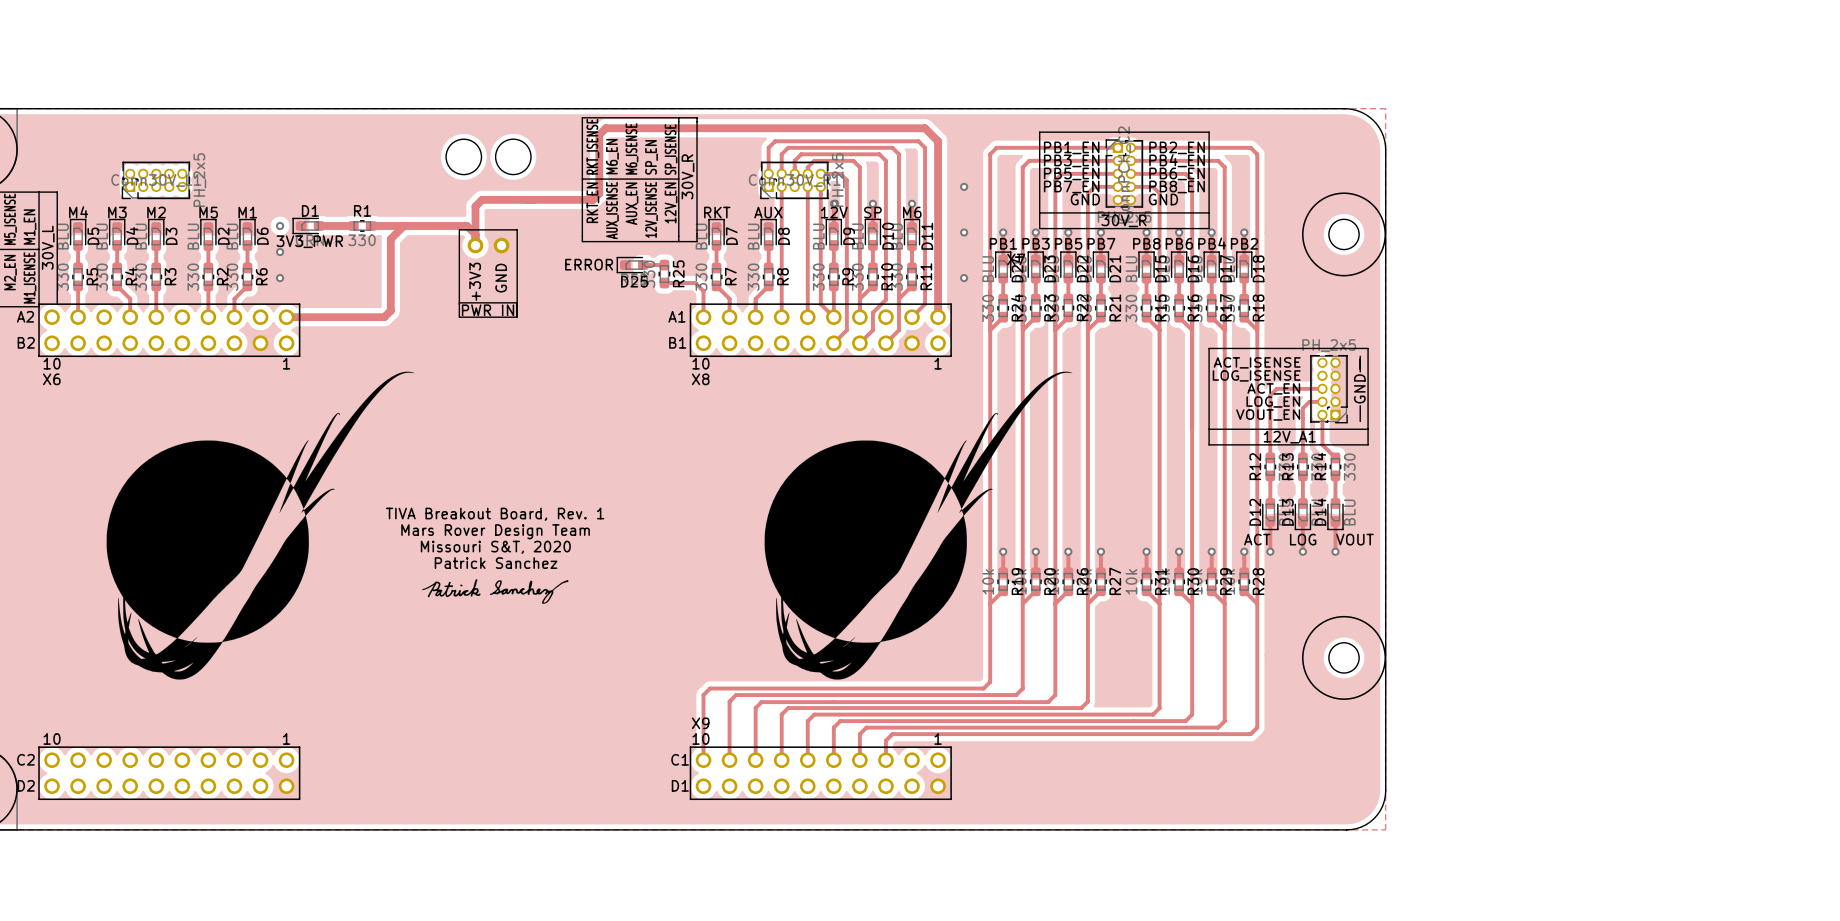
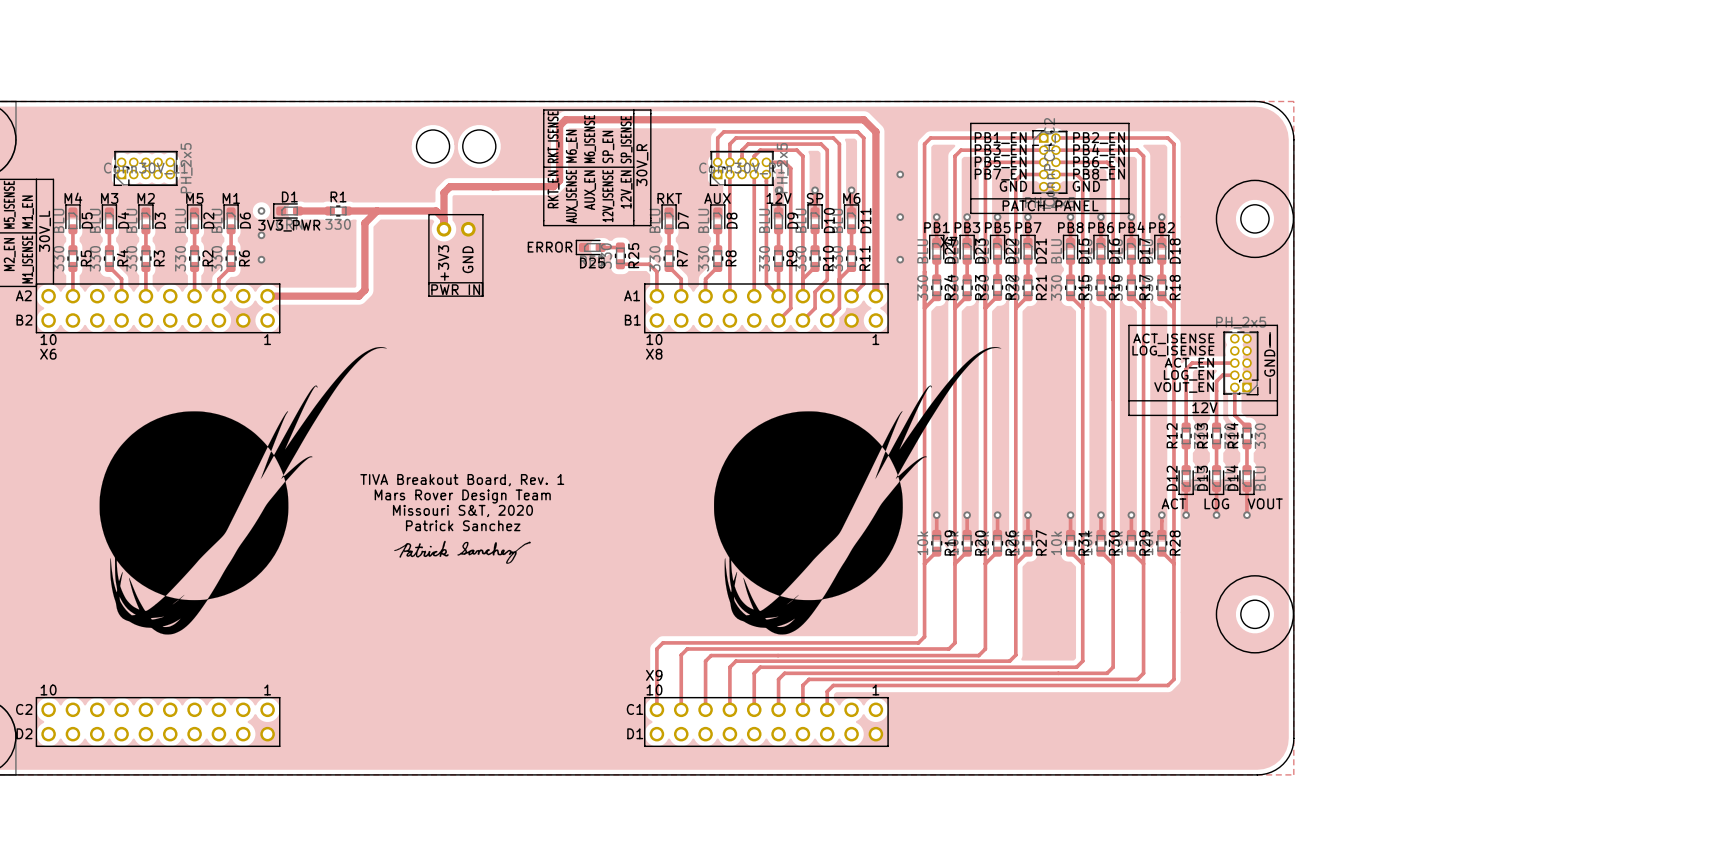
text: 30V_R (1123, 220) -> none
text: none -> PATCH PANEL (1050, 205)
12V_A1 name: 12V_A1 (1289, 437) -> 12V (1204, 407)

